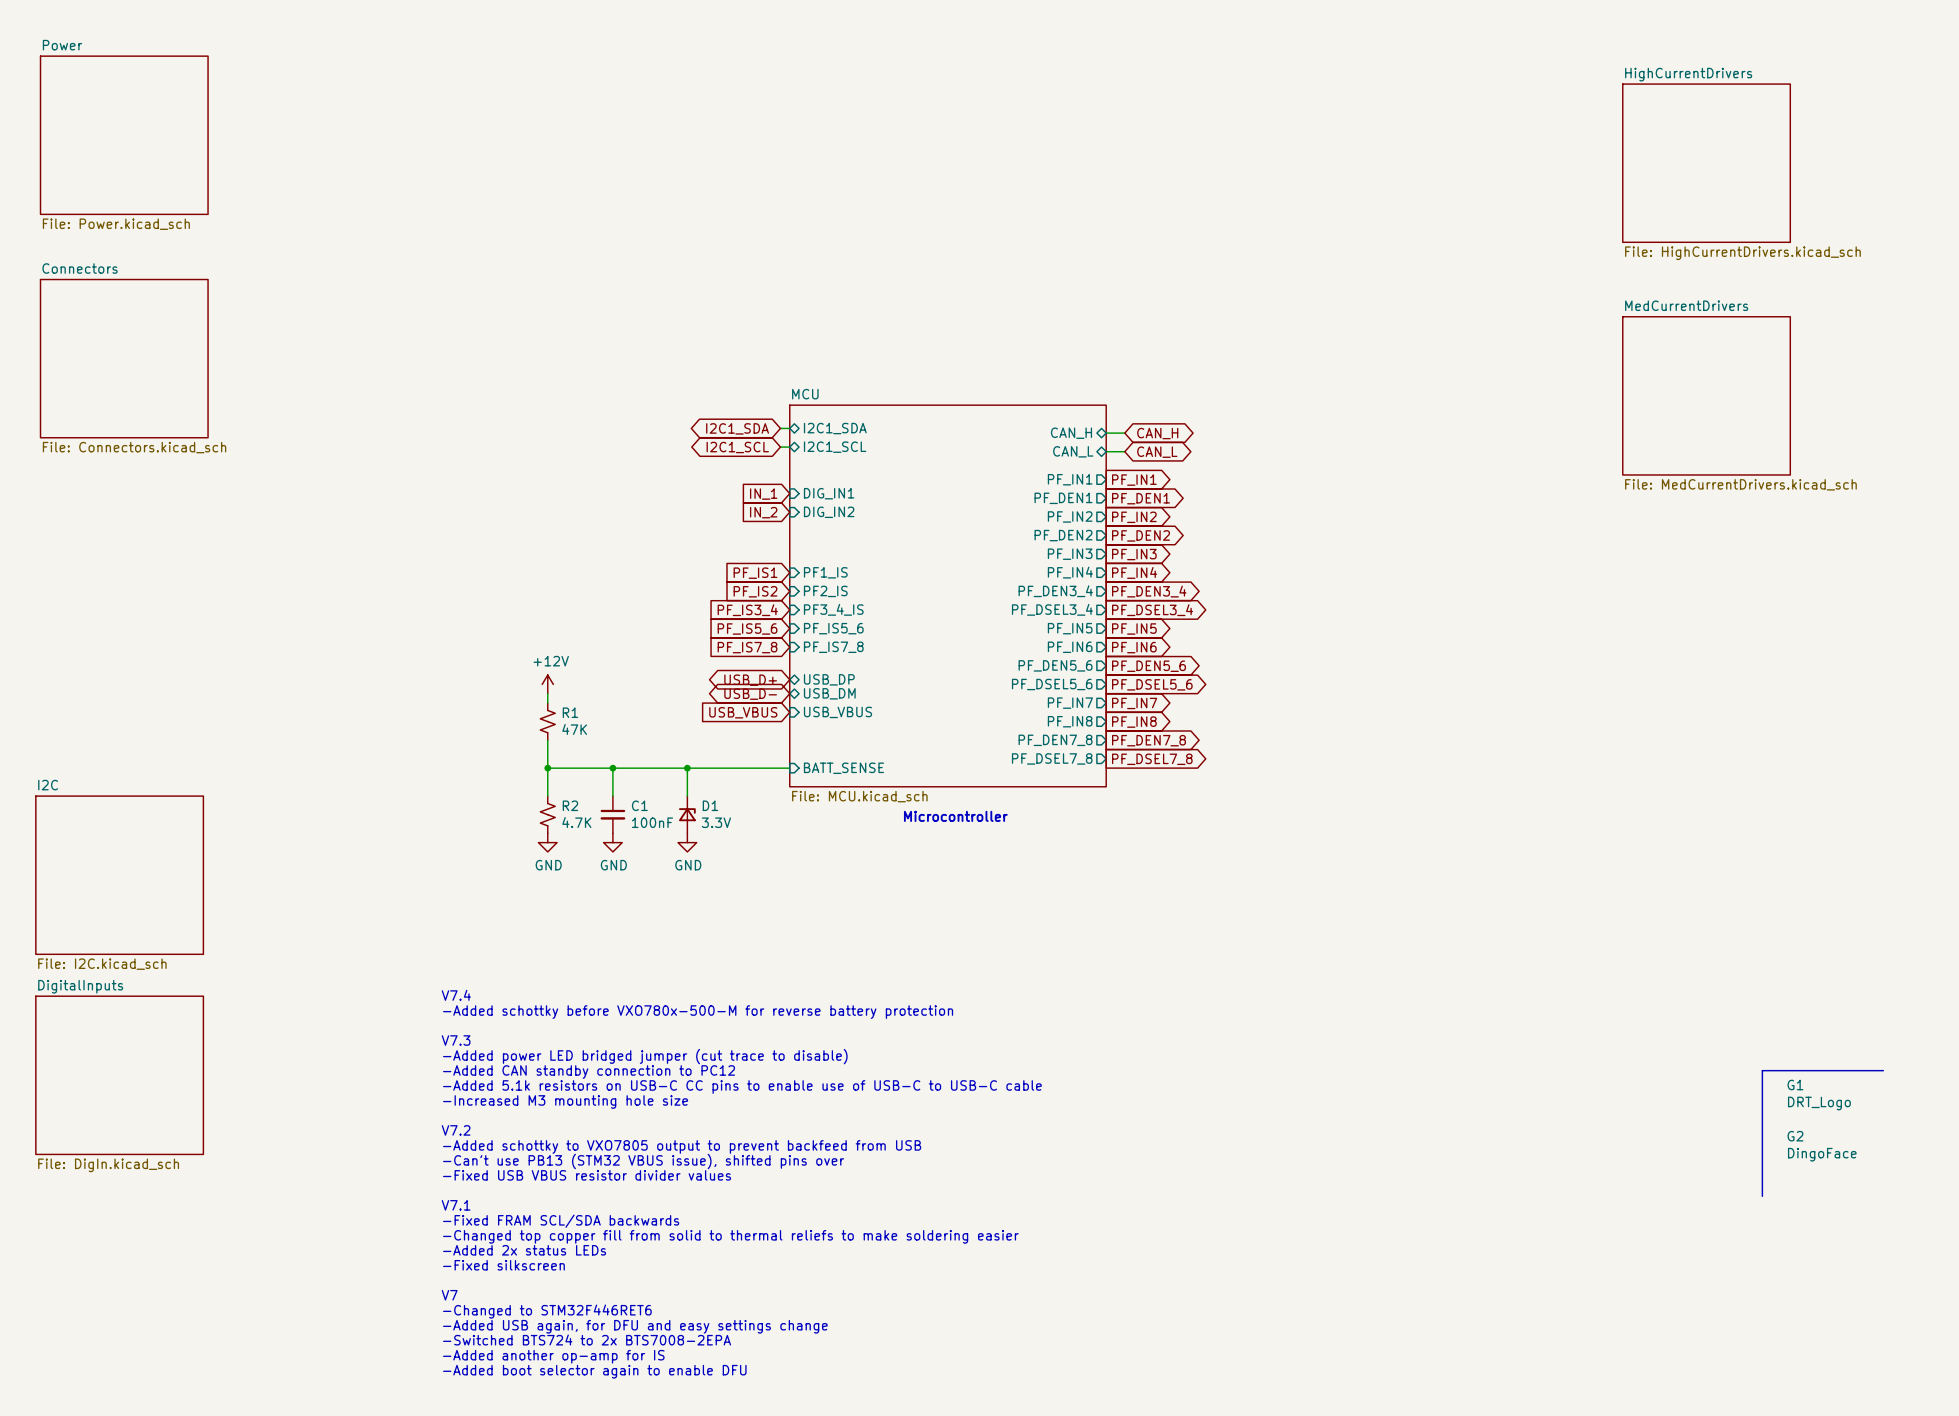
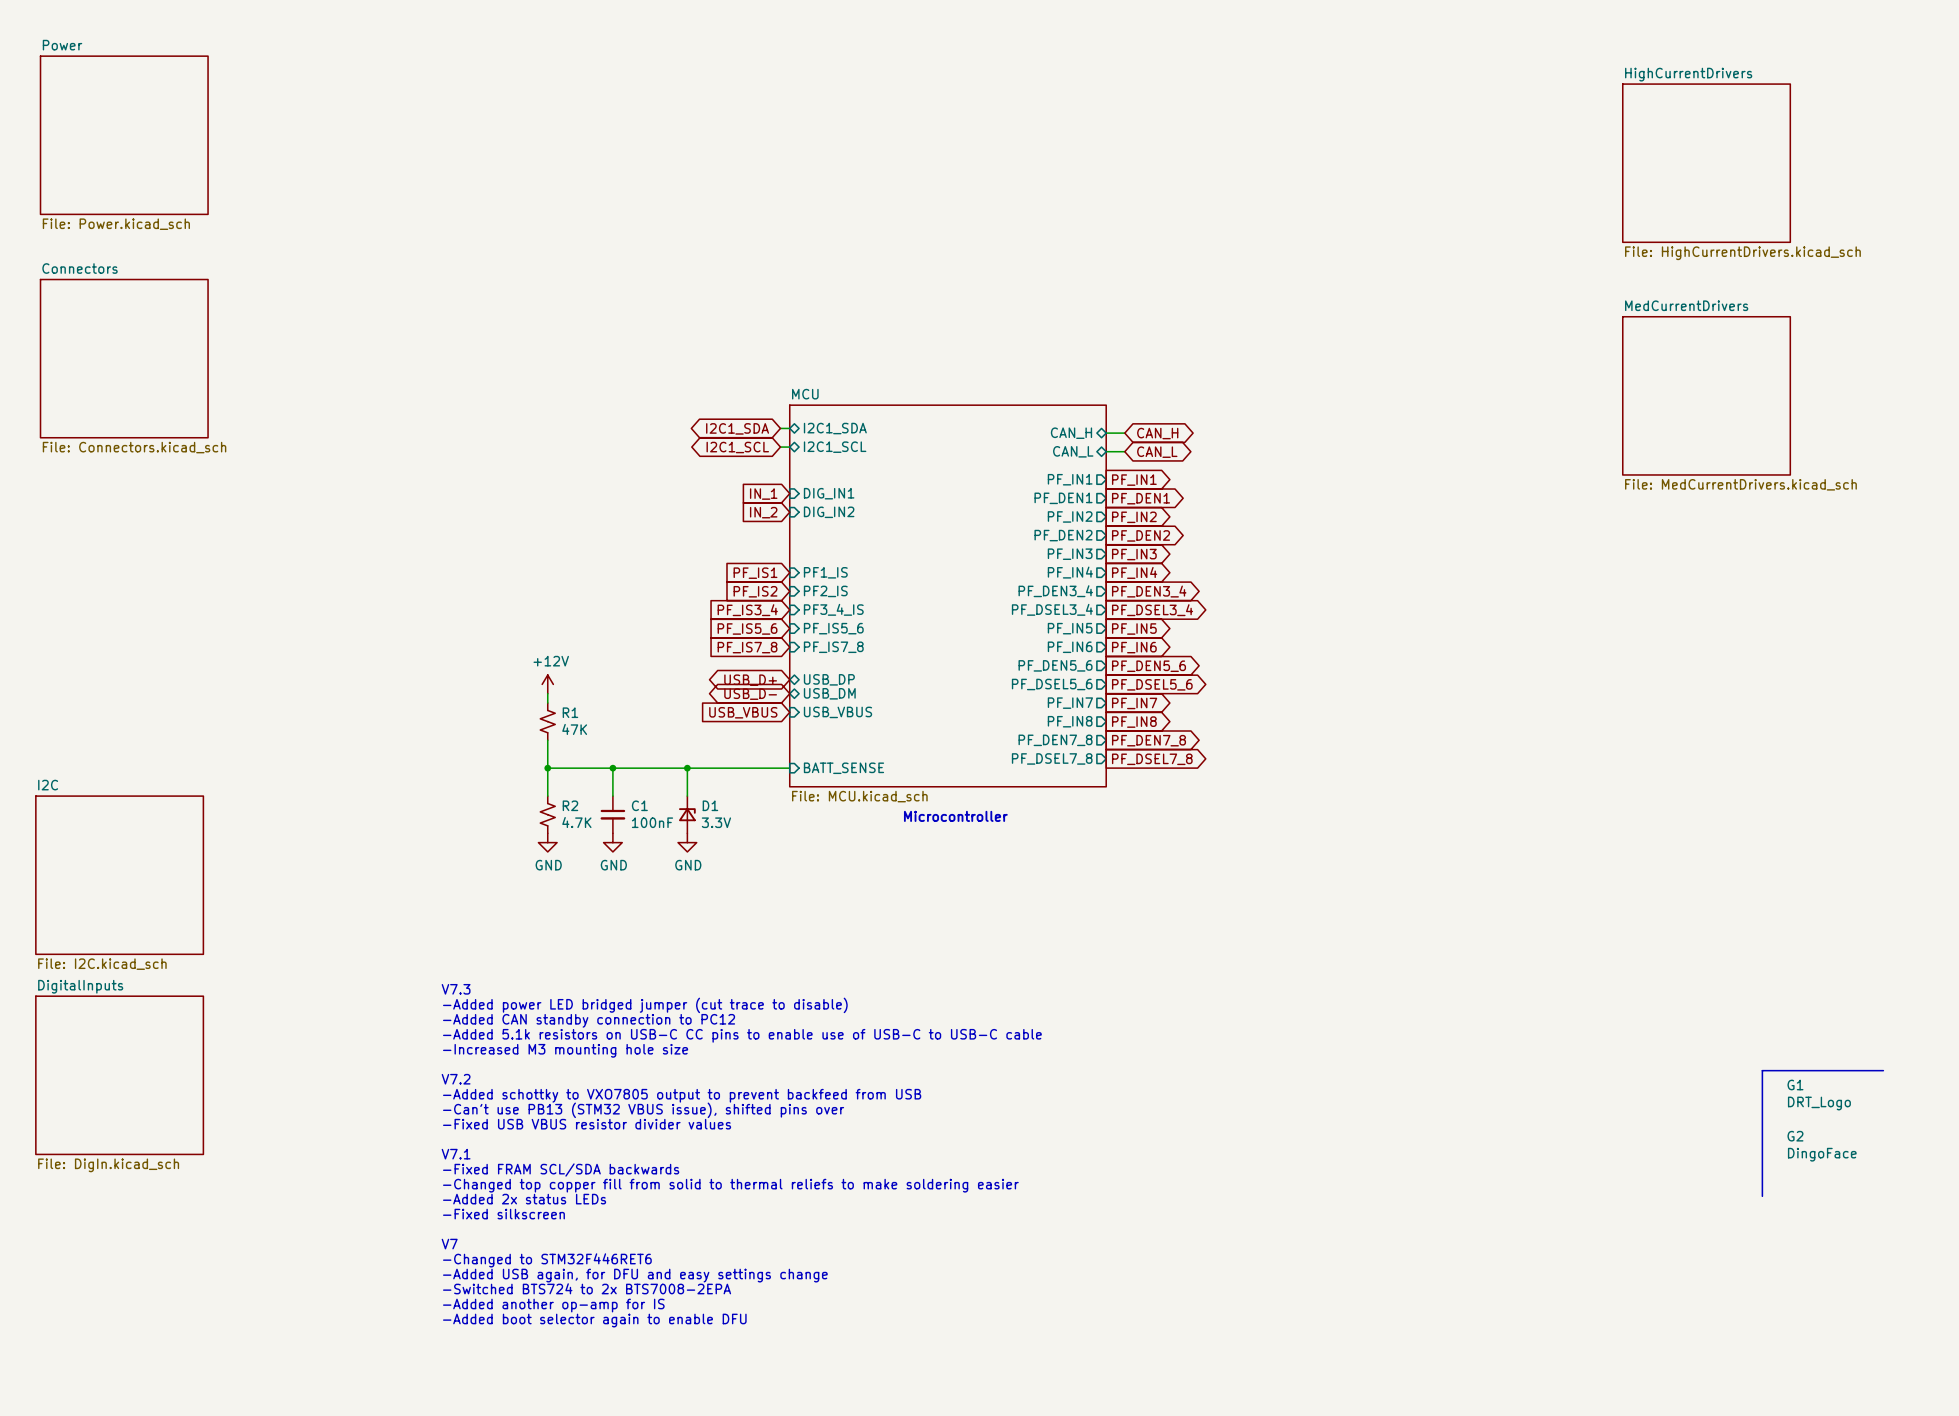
text: V7.4 (456, 995) -> none
text: -Added schottky before VXO780x-500-M for reverse battery protection (698, 1012) -> none
text position: V7.3 (456, 1040) -> V7.3 (456, 989)
text position: -Added power LED bridged jumper (cut trace to disable) (645, 1056) -> -Added power LED bridged jumper (cut trace to disable) (645, 1005)
text position: -Added CAN standby connection to PC12 (589, 1072) -> -Added CAN standby connection to PC12 (589, 1020)
text position: -Added 5.1k resistors on USB-C CC pins to enable use of USB-C to USB-C cable (742, 1087) -> -Added 5.1k resistors on USB-C CC pins to enable use of USB-C to USB-C cable (742, 1035)
text position: -Increased M3 mounting hole size (565, 1102) -> -Increased M3 mounting hole size (565, 1050)
text position: V7.2 (456, 1130) -> V7.2 (456, 1079)
text position: -Added schottky to VXO7805 output to prevent backfeed from USB (682, 1146) -> -Added schottky to VXO7805 output to prevent backfeed from USB (682, 1095)
text position: -Can't use PB13 (STM32 VBUS issue), shifted pins over (643, 1161) -> -Can't use PB13 (STM32 VBUS issue), shifted pins over (643, 1110)
text position: -Fixed USB VBUS resistor divider values (587, 1175) -> -Fixed USB VBUS resistor divider values (587, 1124)
text position: V7.1 (456, 1205) -> V7.1 (456, 1154)
text position: -Fixed FRAM SCL/SDA backwards (561, 1221) -> -Fixed FRAM SCL/SDA backwards (561, 1170)
text position: -Changed top copper fill from solid to thermal reliefs to make soldering easier (730, 1236) -> -Changed top copper fill from solid to thermal reliefs to make soldering easier (730, 1185)
text position: -Added 2x status LEDs (524, 1250) -> -Added 2x status LEDs (524, 1199)
text position: -Fixed silkscreen (503, 1265) -> -Fixed silkscreen (503, 1214)
text position: V7 (449, 1295) -> V7 (449, 1244)
text position: -Changed to STM32F446RET6 (547, 1311) -> -Changed to STM32F446RET6 (547, 1260)
text position: -Added USB again, for DFU and easy settings change (635, 1326) -> -Added USB again, for DFU and easy settings change (635, 1275)
text position: -Switched BTS724 to 2x BTS7008-2EPA (587, 1339) -> -Switched BTS724 to 2x BTS7008-2EPA (587, 1288)
text position: -Added another op-amp for IS (553, 1356) -> -Added another op-amp for IS (553, 1305)
text position: -Added boot selector again to enable DFU (594, 1371) -> -Added boot selector again to enable DFU (594, 1320)

